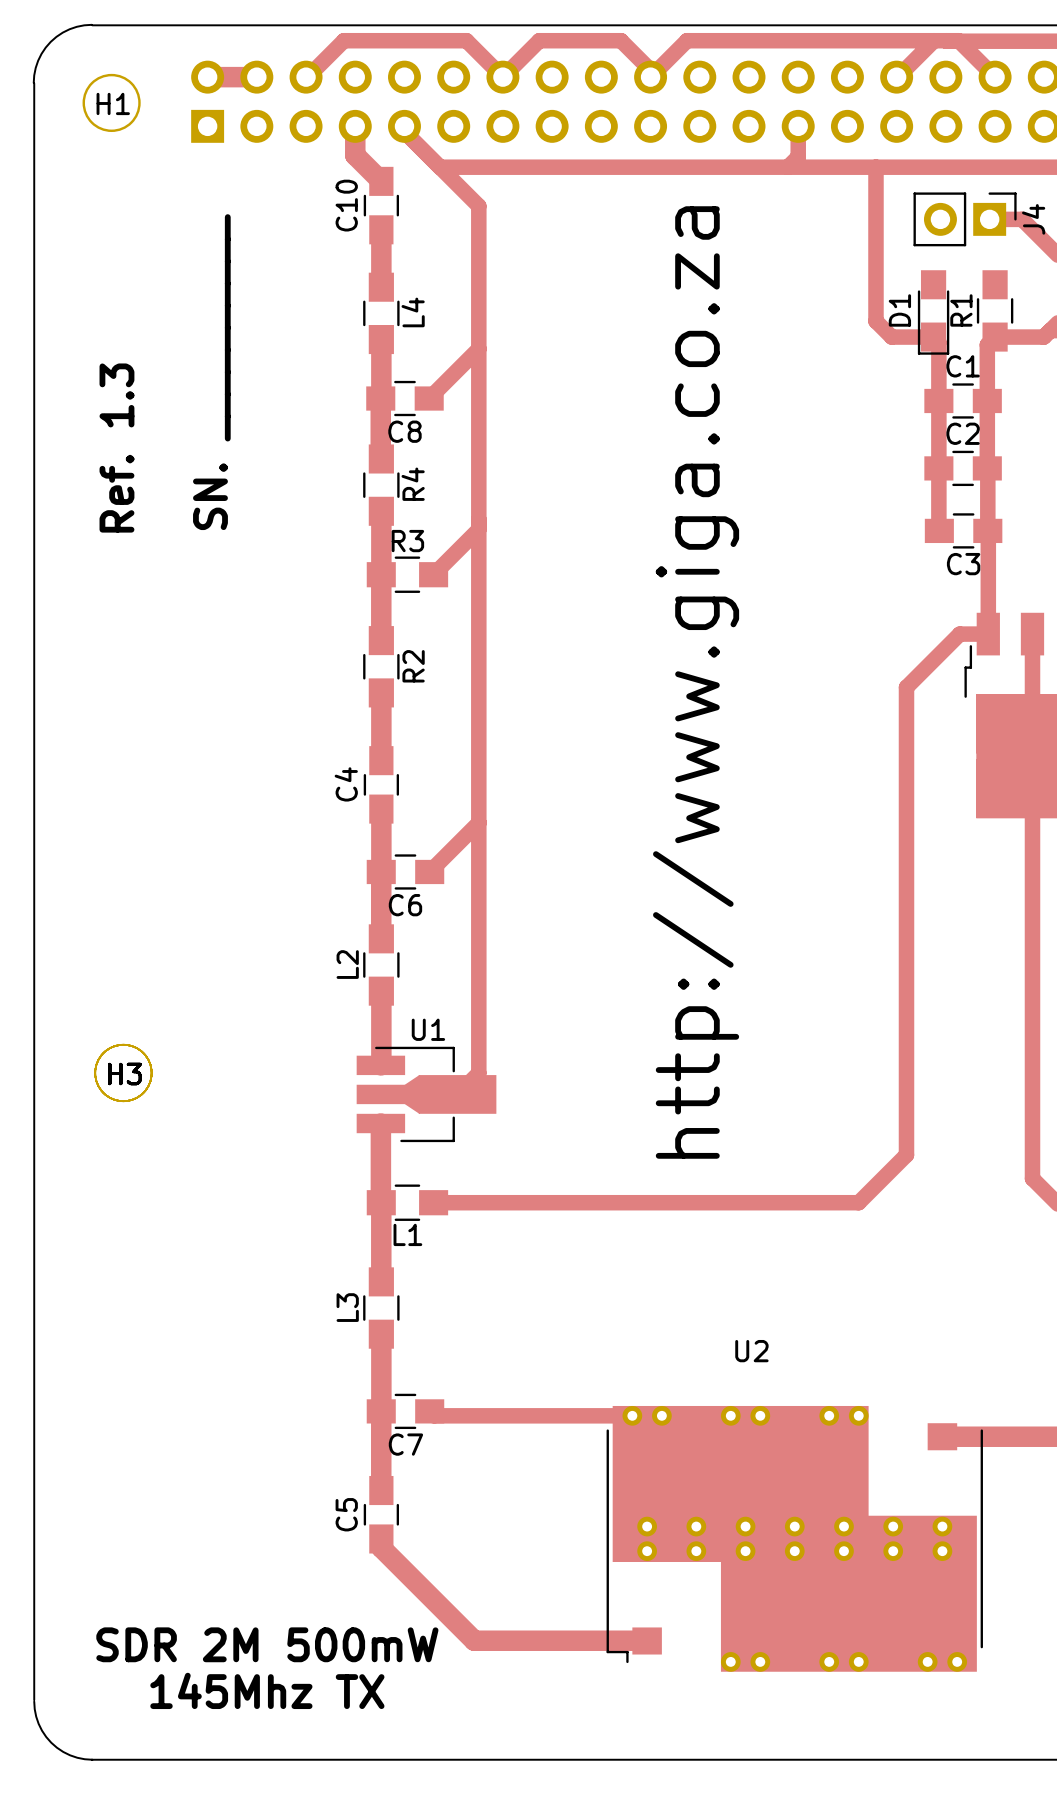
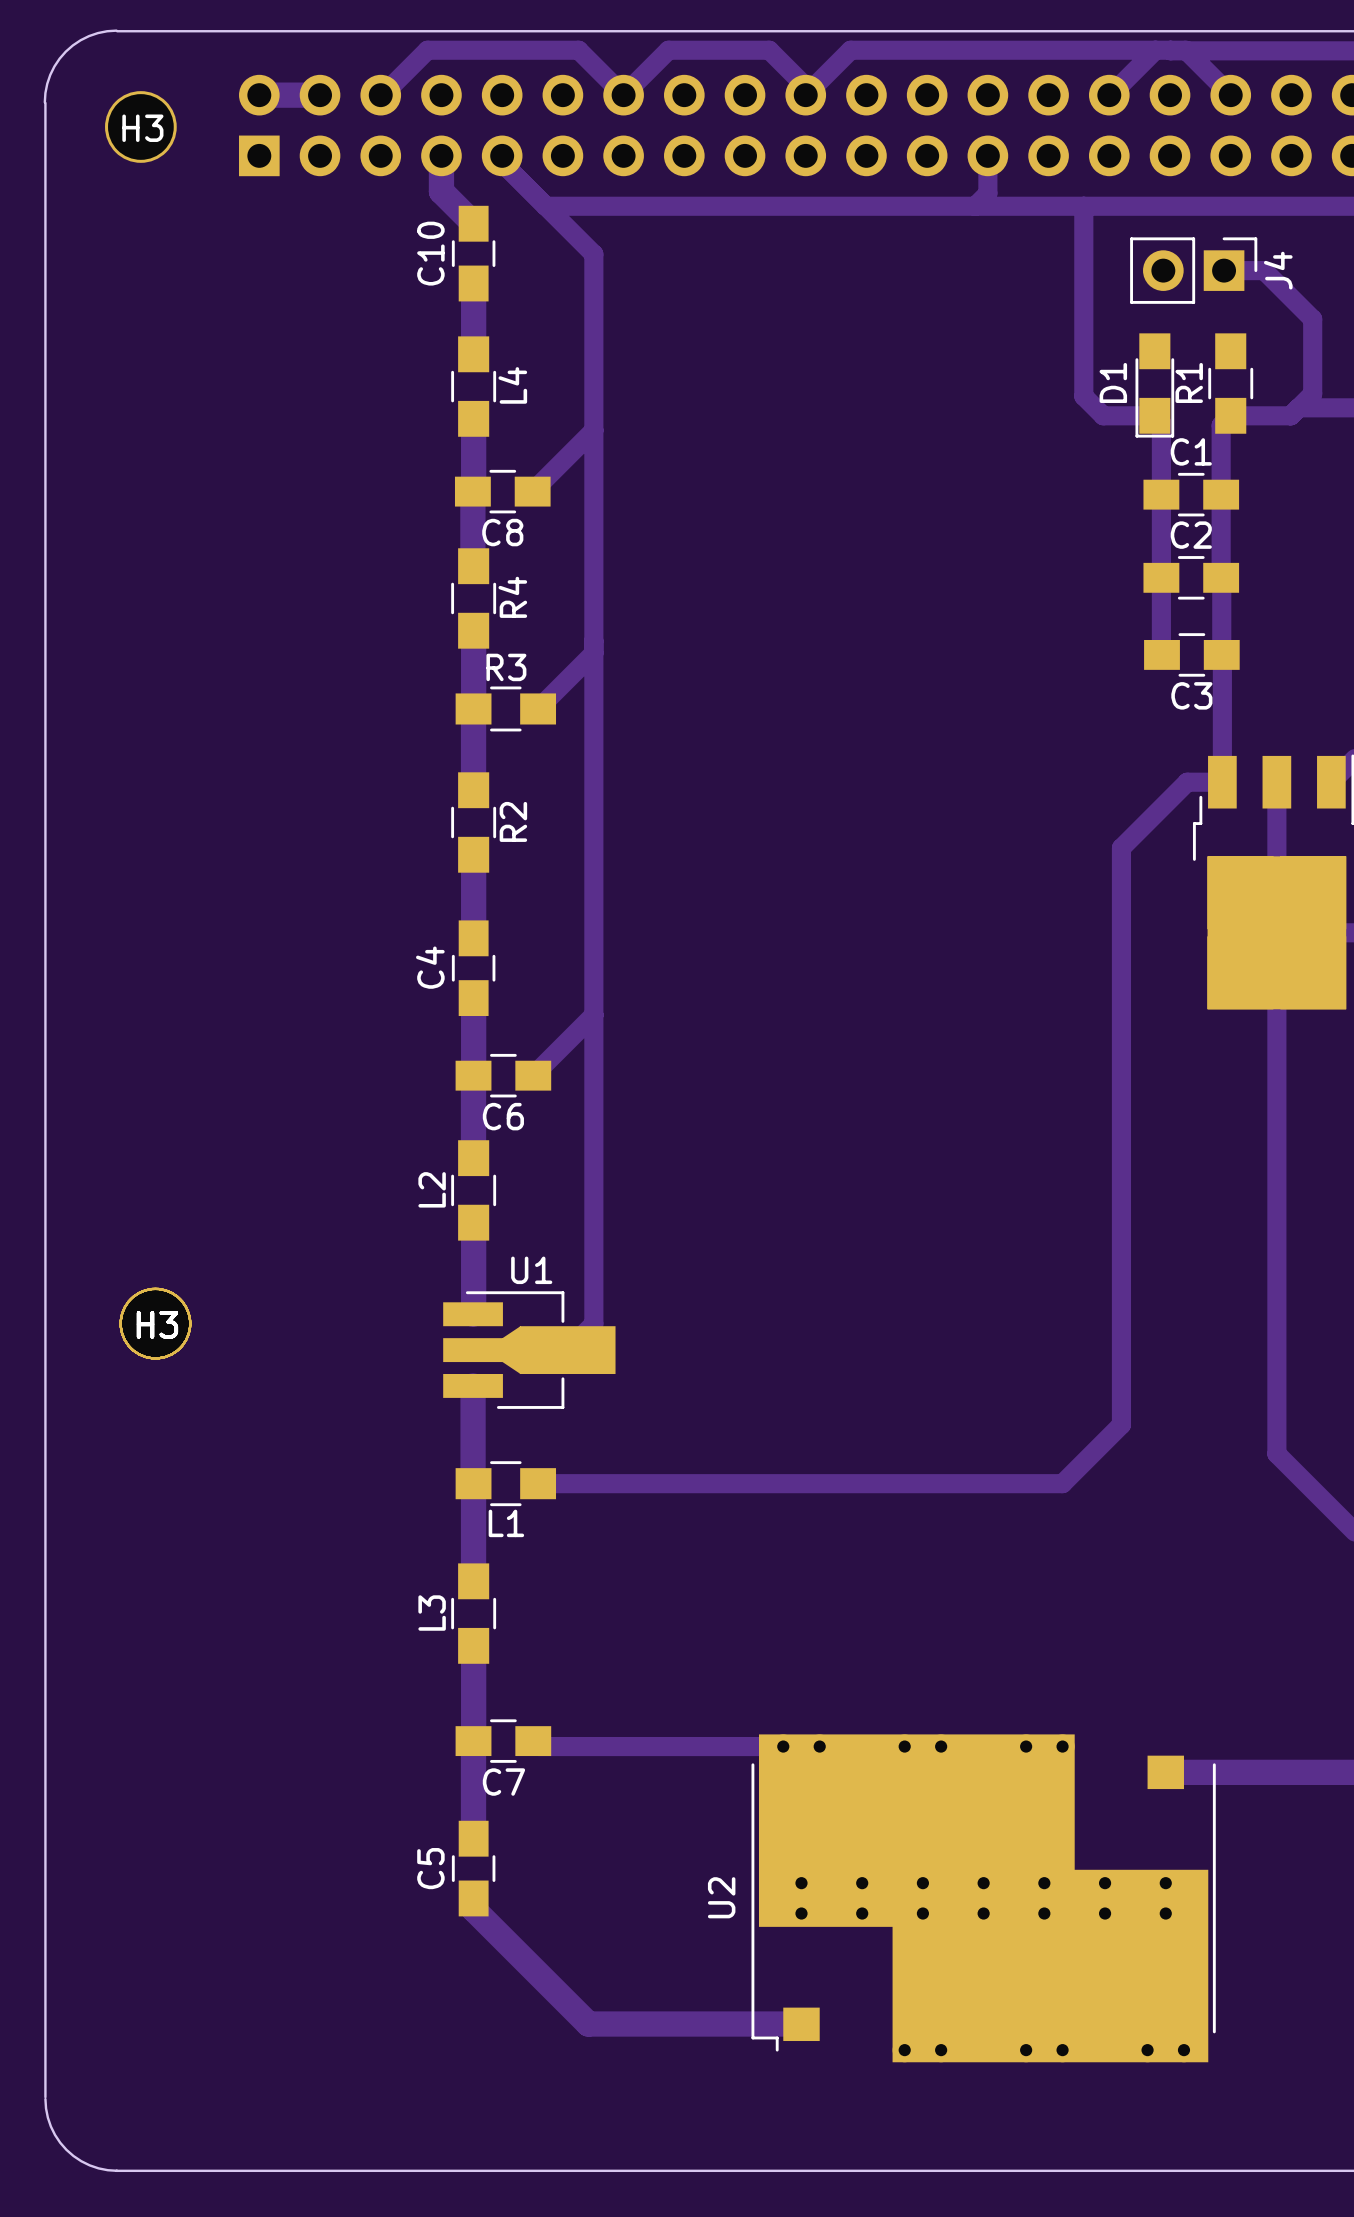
H1 name: H1 (113, 103) -> H3 (142, 128)
text: SN. __________ (211, 372) -> none
text: Ref. 1.3 (116, 448) -> none
text: http://www.giga.co.za (696, 682) -> none
U2 name rotation: 0° (751, 1351) -> 90° counterclockwise (721, 1897)
U2 name position: U2 (751, 1351) -> U2 (721, 1897)
text: SDR 2M 500mW (267, 1644) -> none
text: 145Mhz TX (267, 1690) -> none

